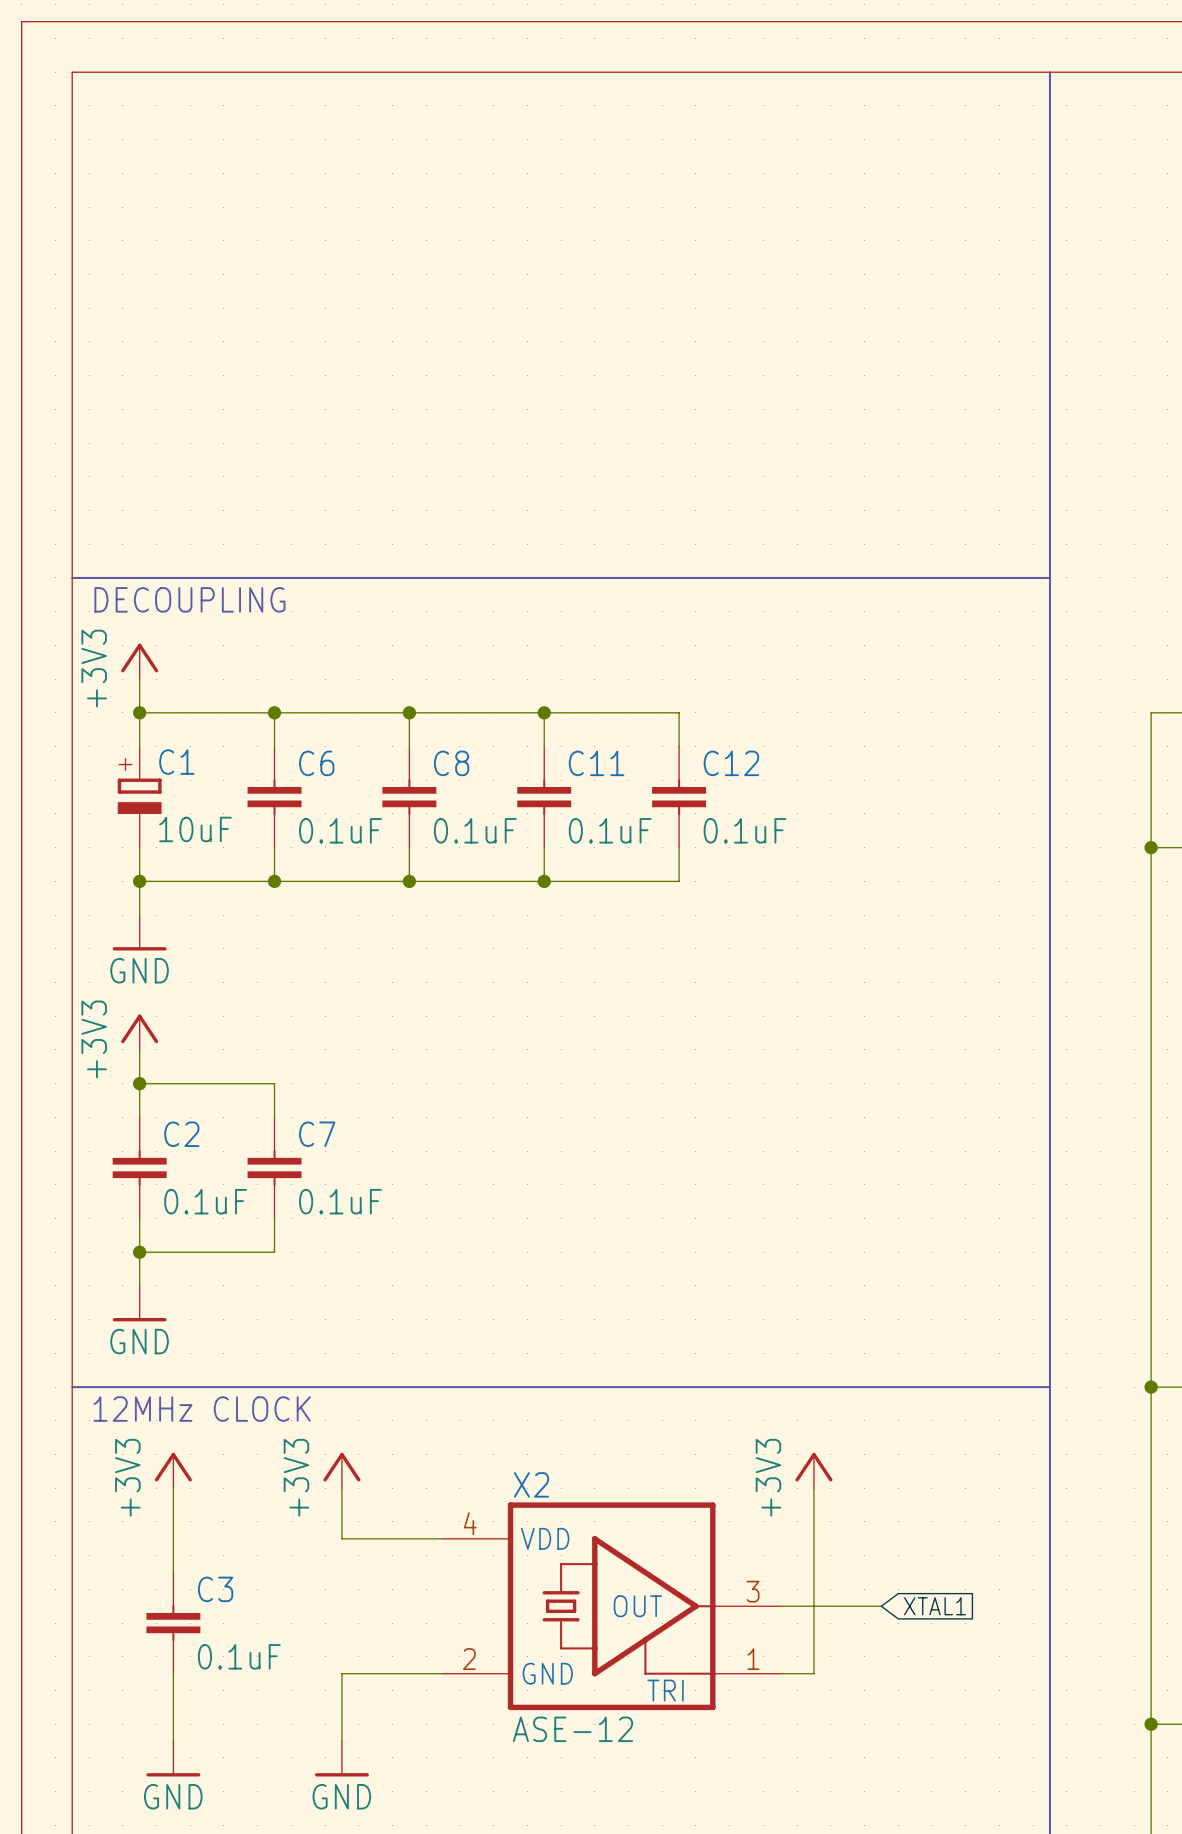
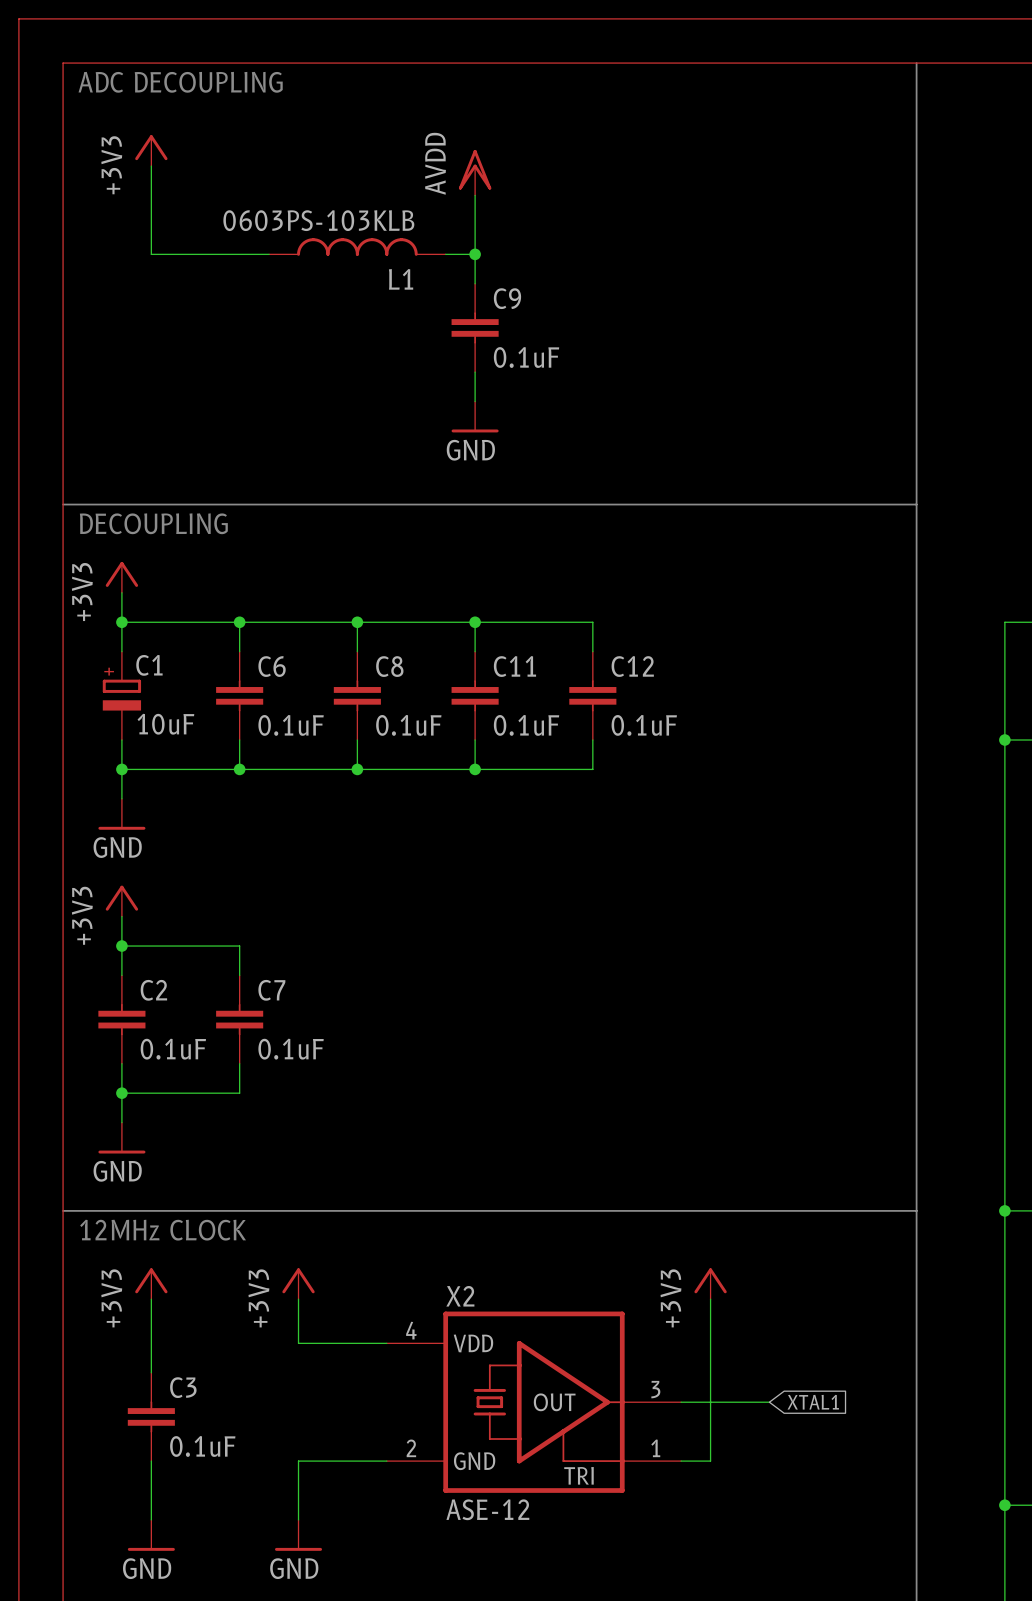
text: none -> ADC DECOUPLING (180, 82)
power symbol: none -> +3V3 (151, 150)
wire: none -> (151, 166) (151, 254) (269, 254)
power symbol: none -> AVDD (475, 172)
wire: none -> (475, 195) (475, 283)
L1: none -> 0603PS-103KLB (357, 247)
wire: none -> (445, 254) (475, 254)
junction: none -> (475, 254)
C9: none -> 0.1uF (475, 327)
wire: none -> (475, 372) (475, 401)
power symbol: none -> GND (475, 416)

